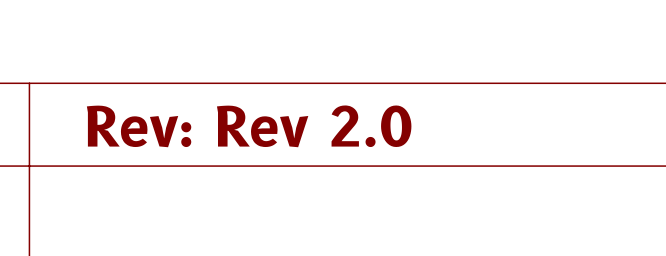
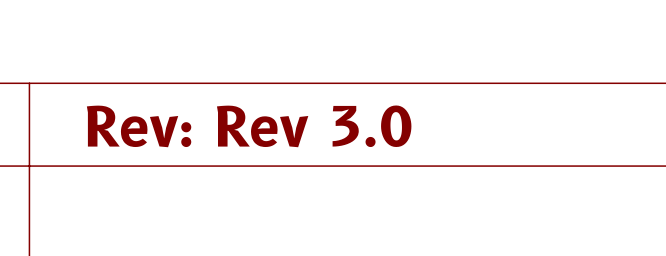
title block: Rev: Rev 2.0 (249, 126) -> Rev: Rev 3.0 (249, 126)

